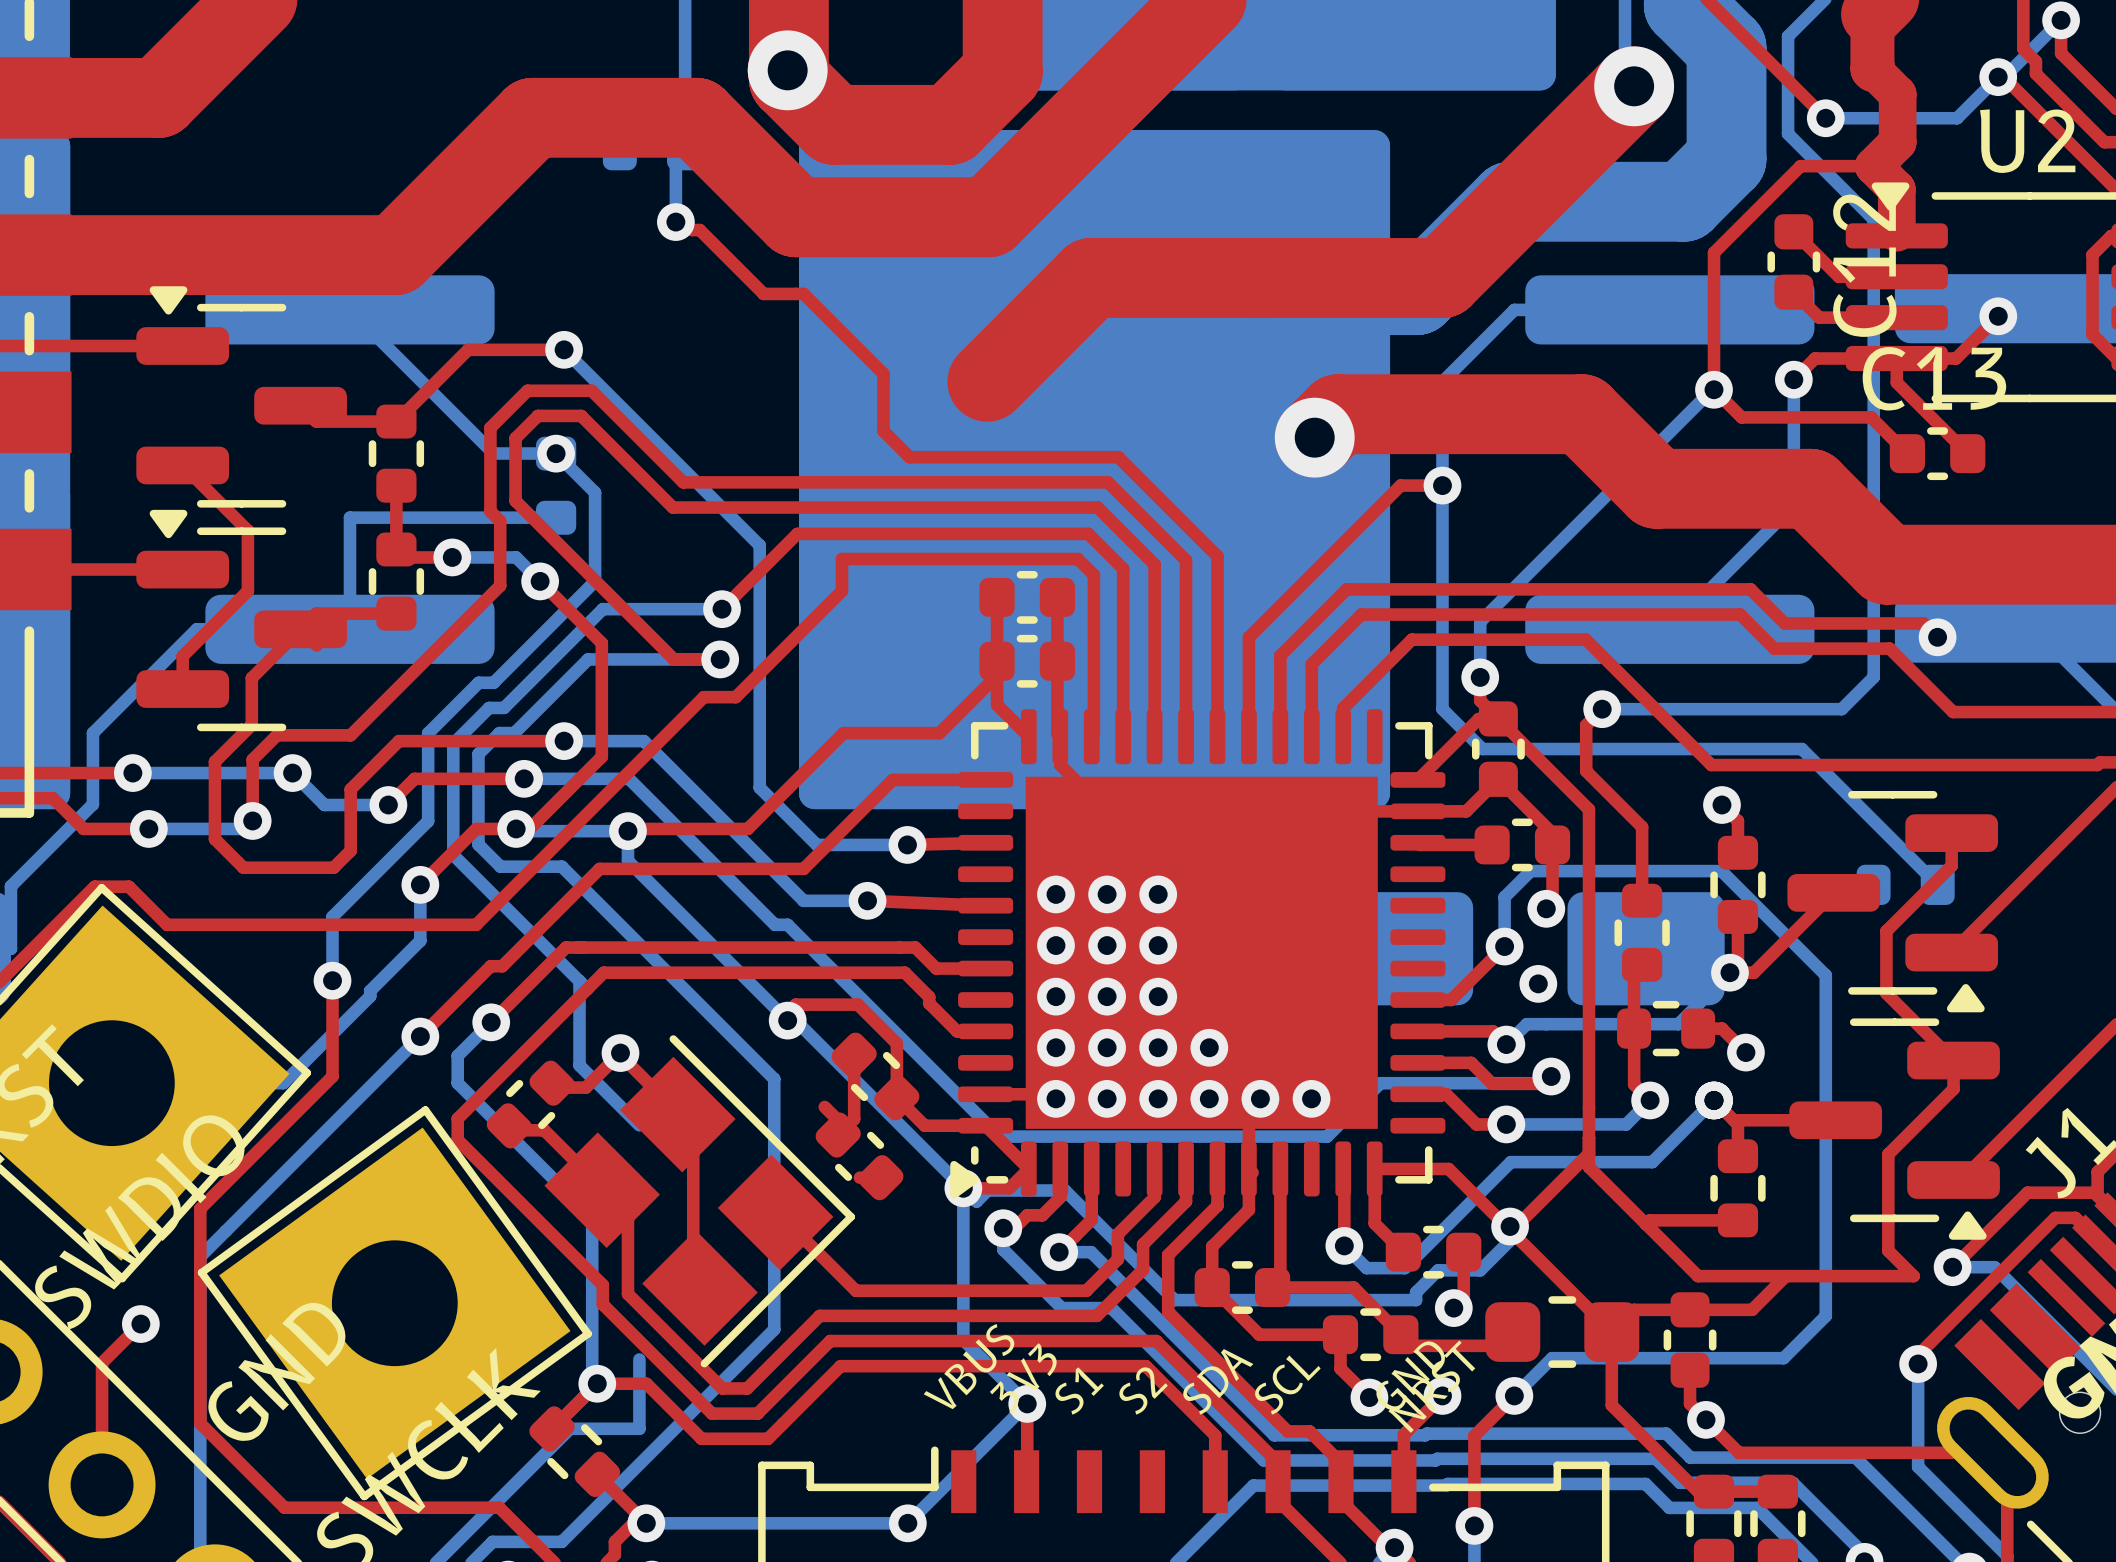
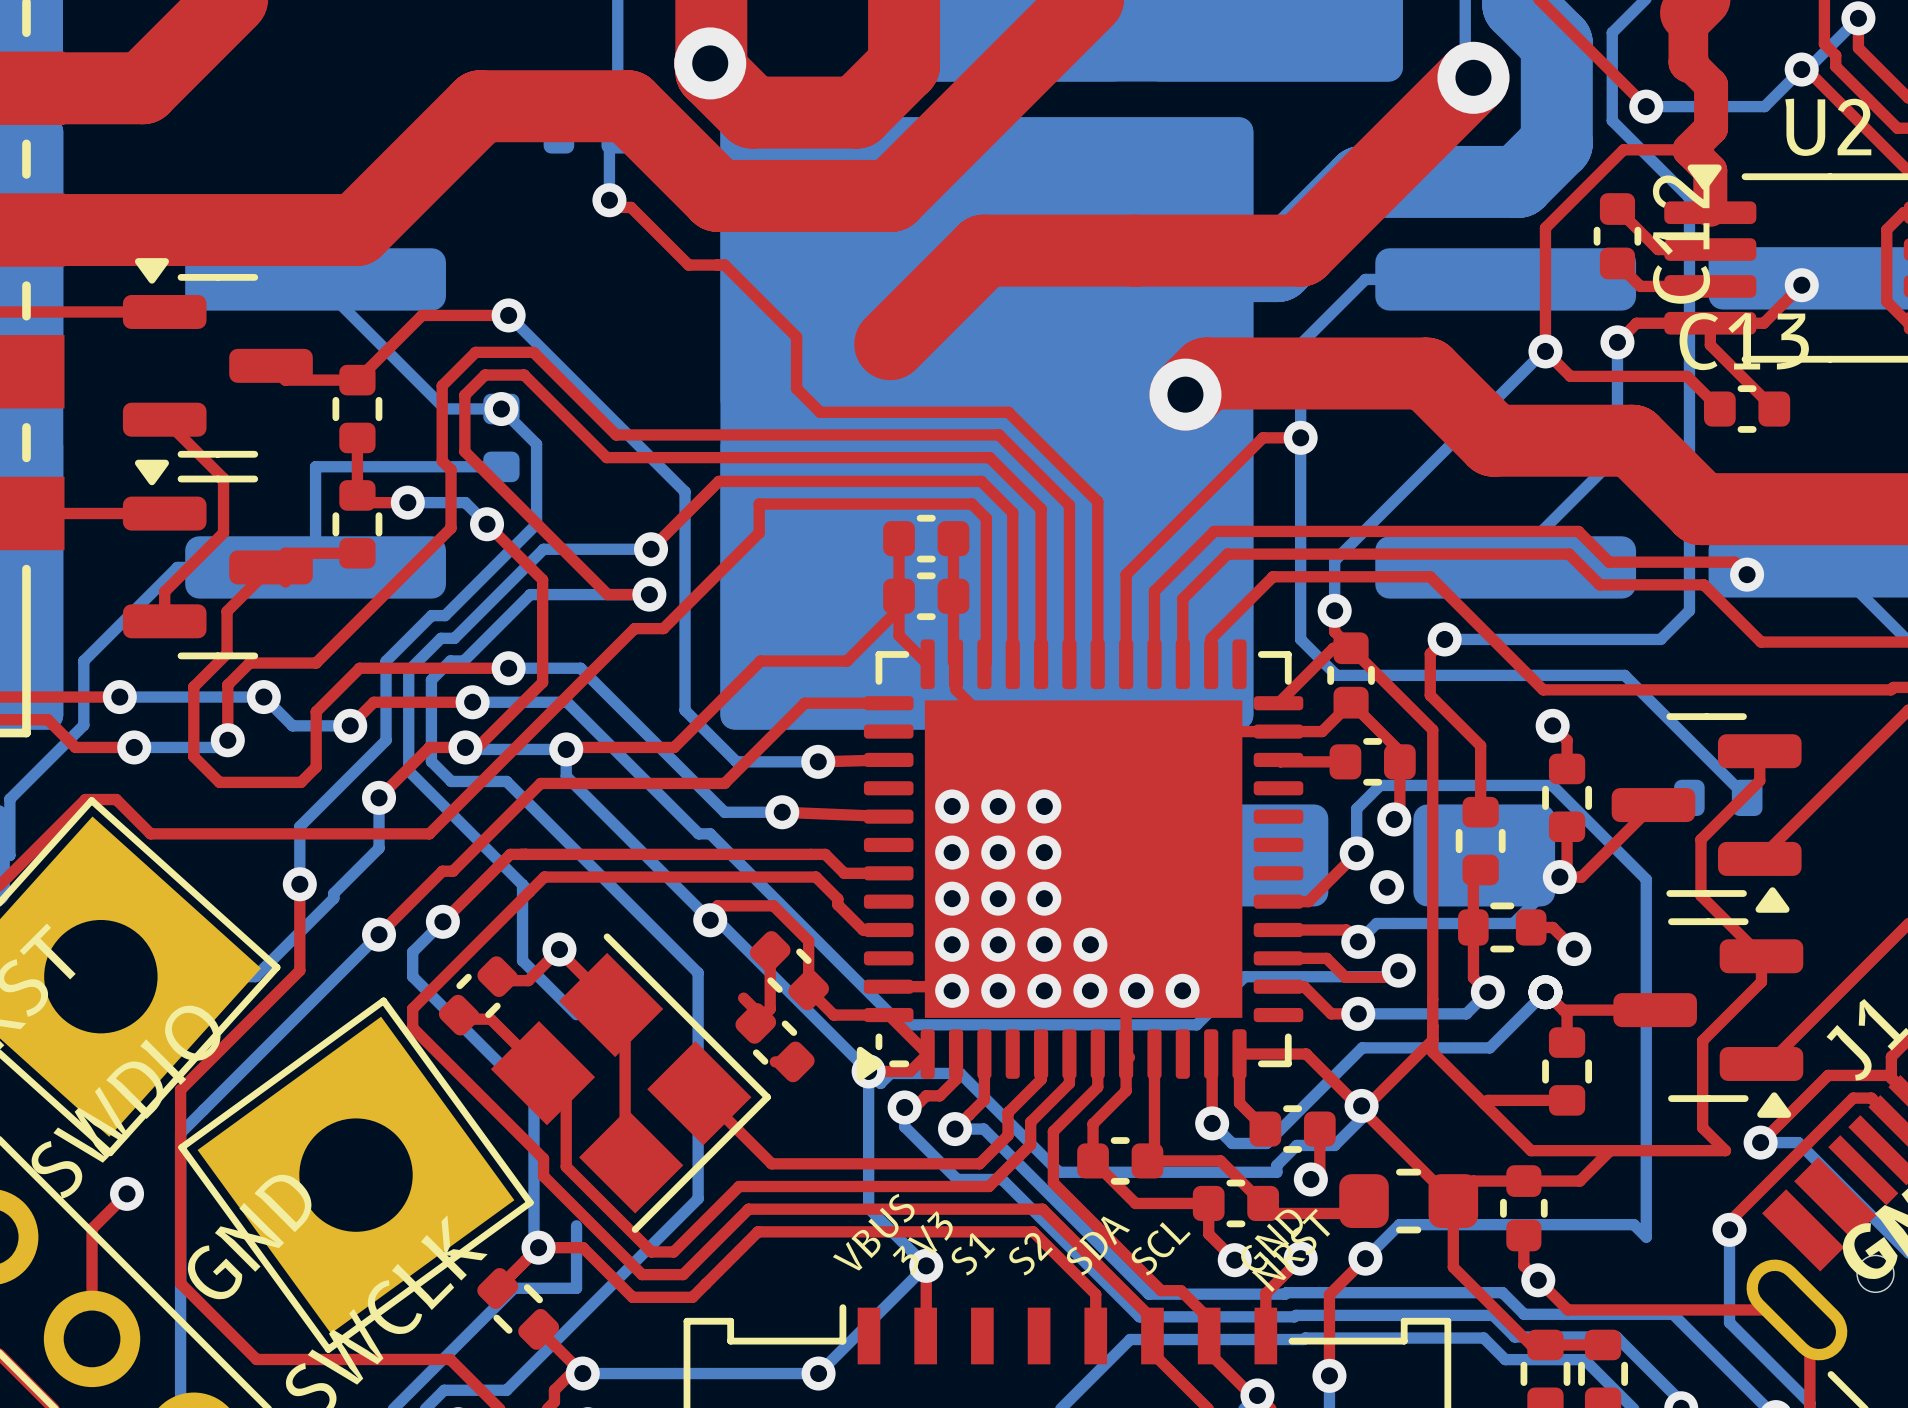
bottom track: (1825, 1316) (1783, 1358) -> (1646, 1186) (1646, 1237) (1633, 1224) (1608, 1224)

